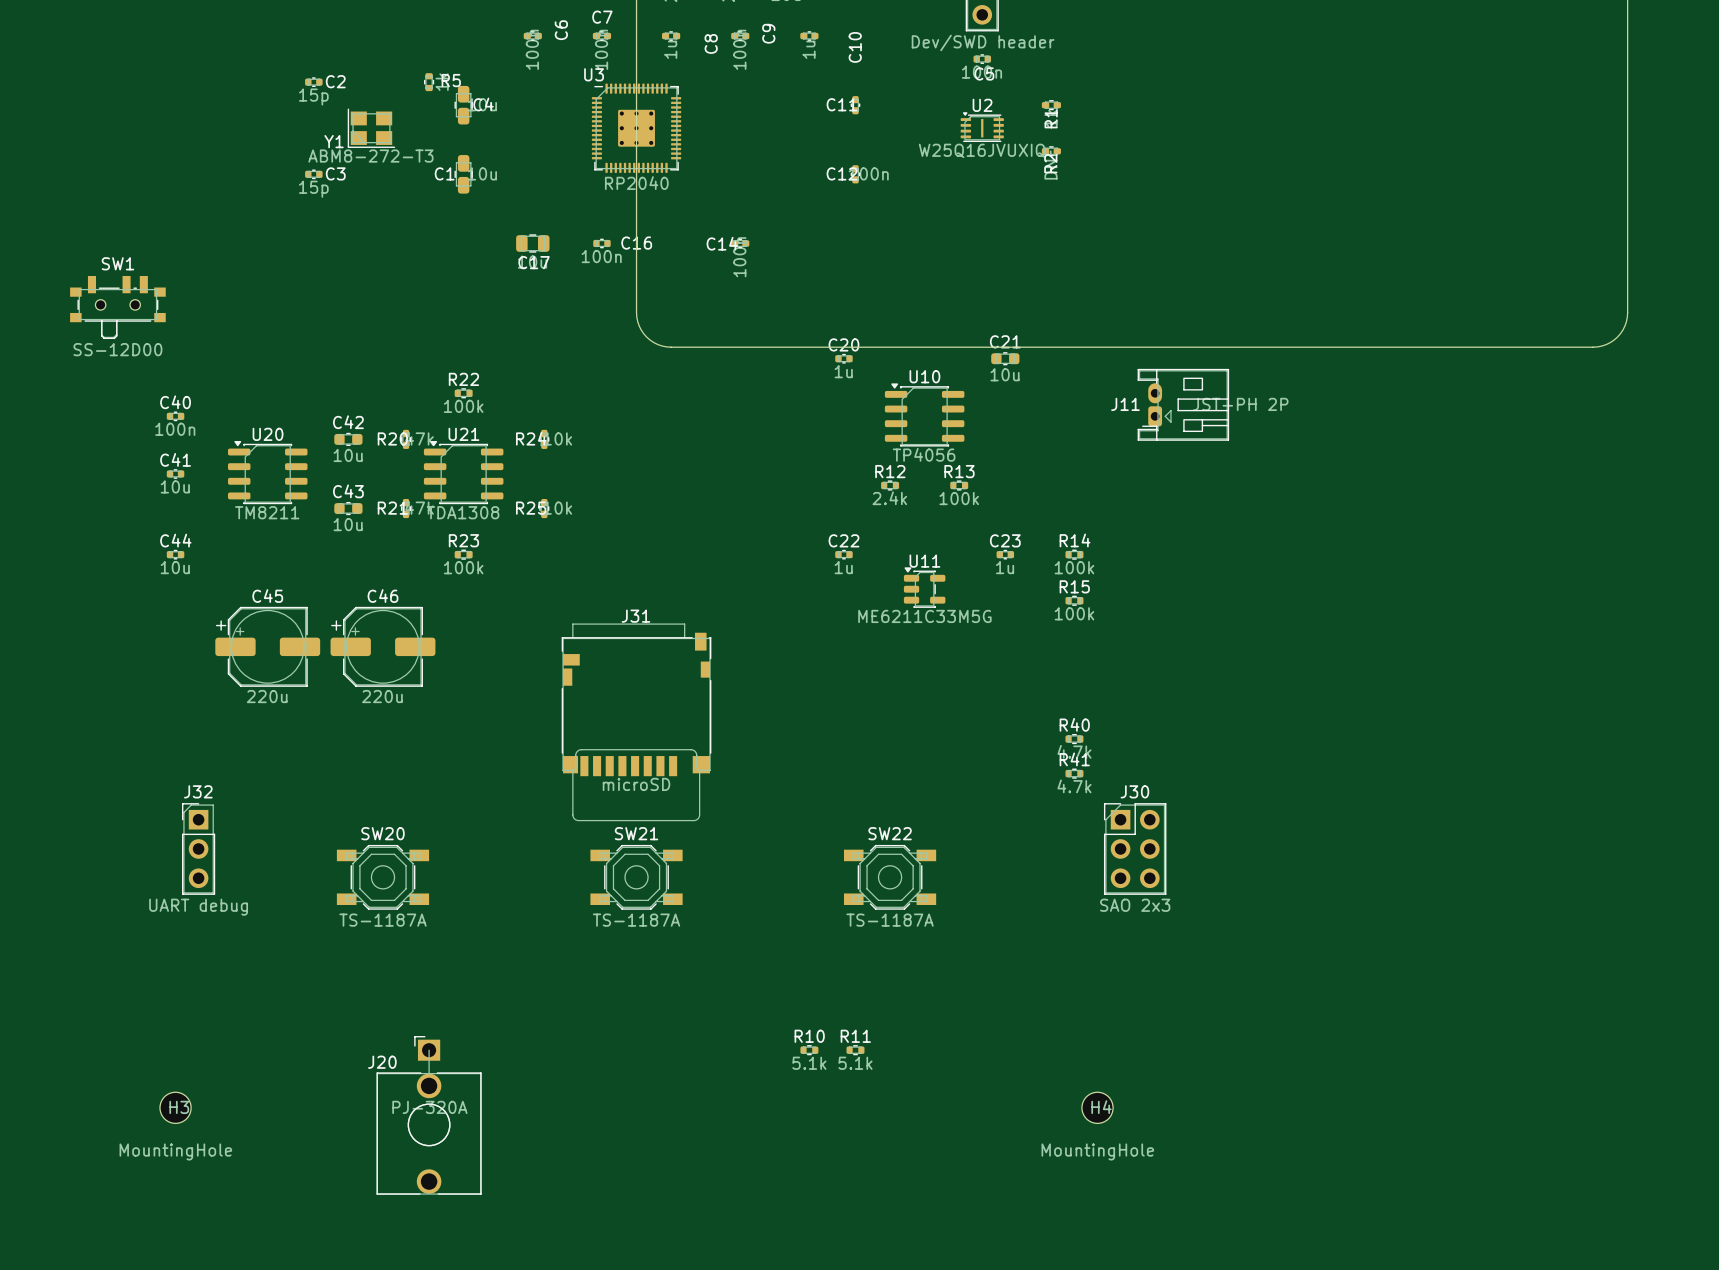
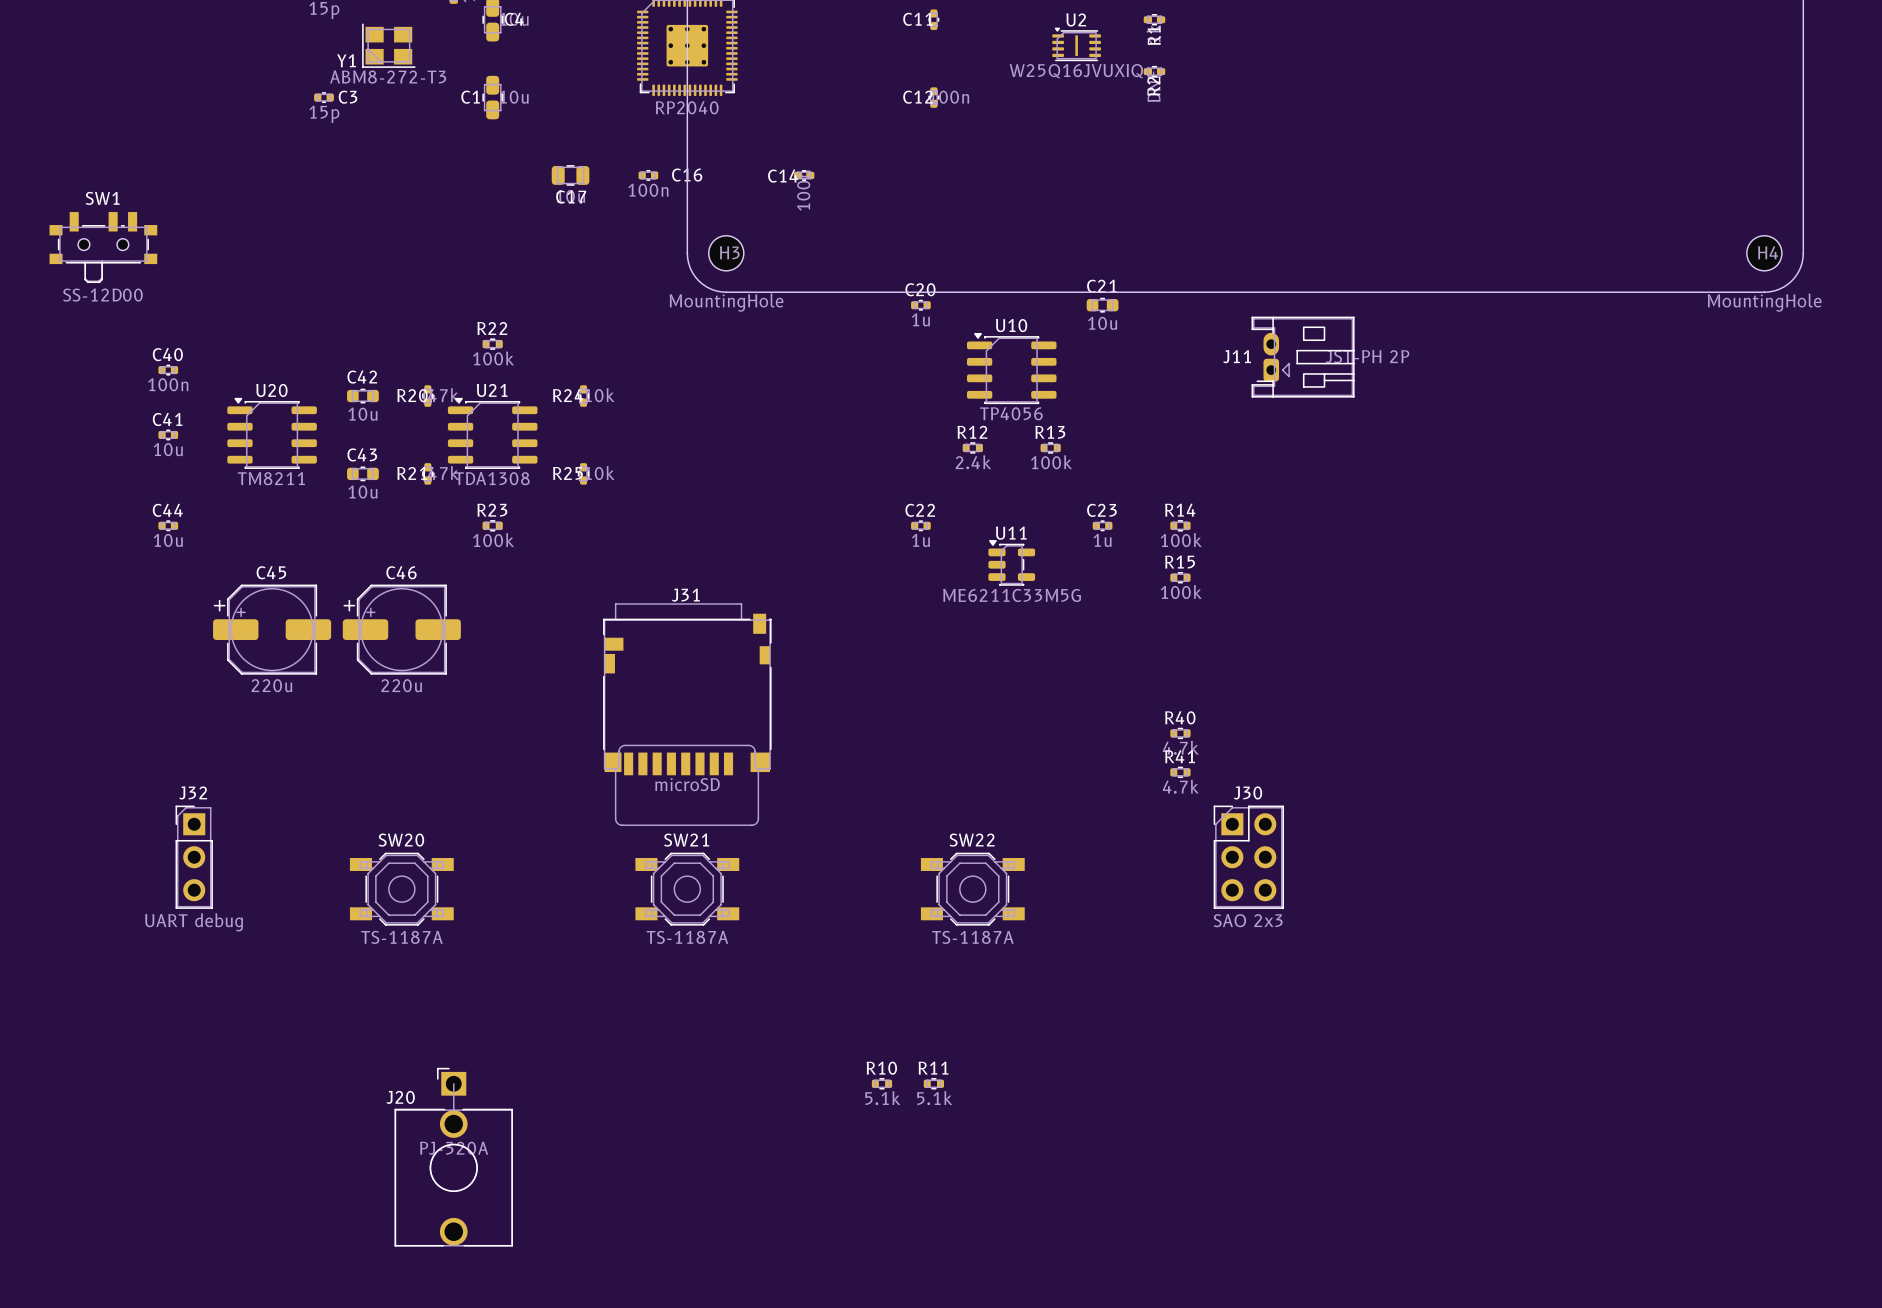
H3 position: (175, 1107) -> (726, 253)
H4 position: (1097, 1107) -> (1764, 253)

